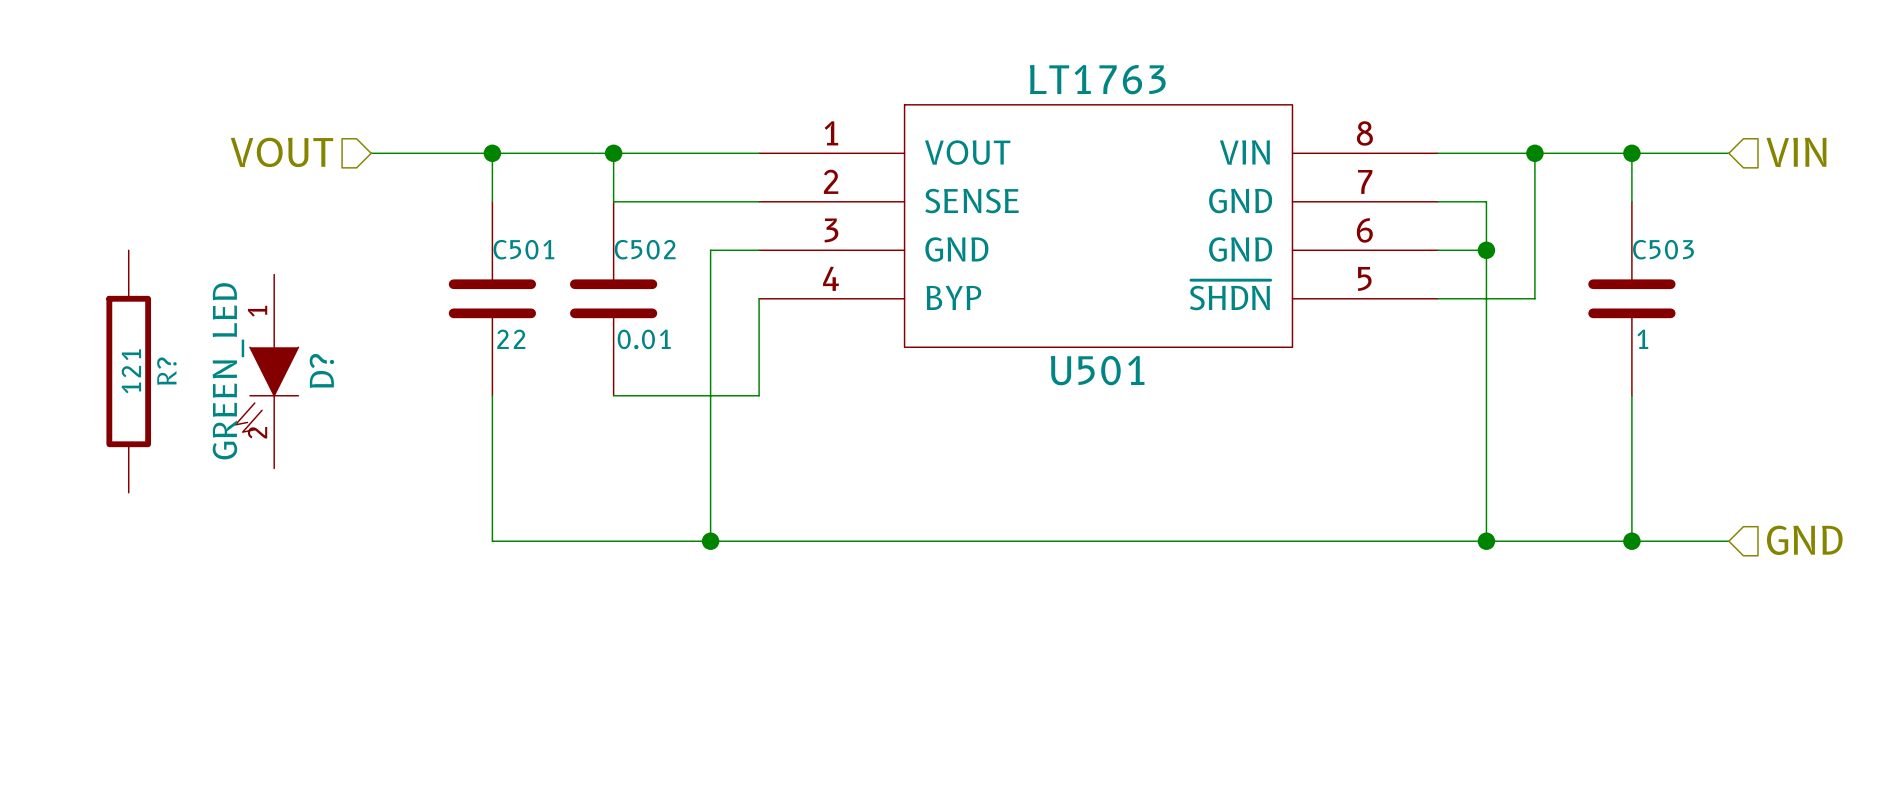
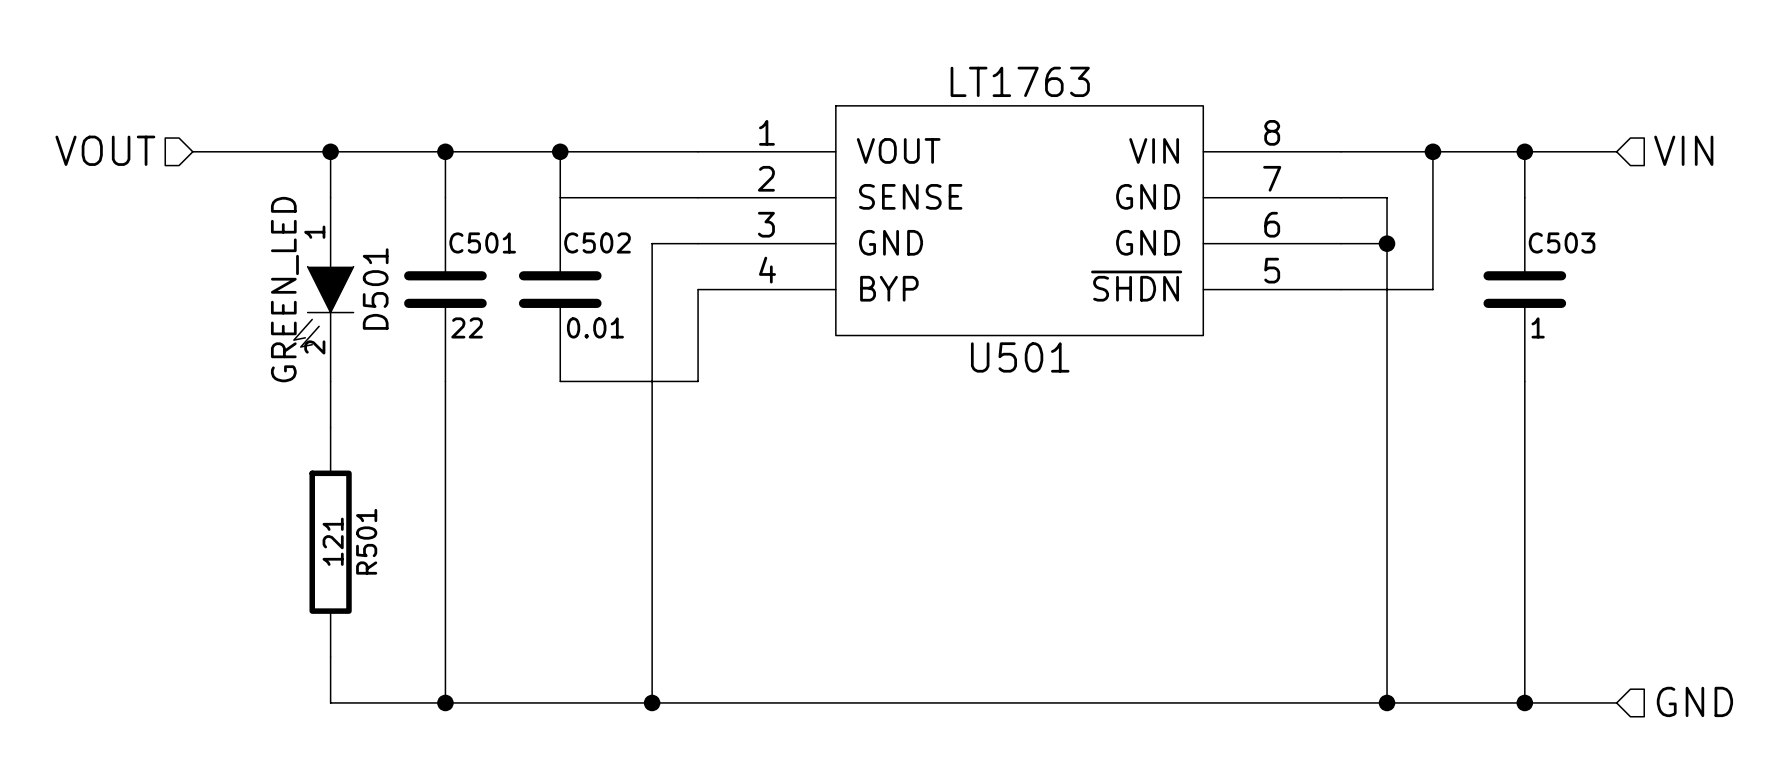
hierarchical label position: VOUT (281, 152) -> VOUT (105, 150)
wire: none -> (192, 151) (330, 151) (330, 197)
junction: none -> (330, 151)
D501: none -> GREEN_LED (323, 289)
R?: 121 (128, 371) -> none
D?: GREEN_LED (266, 371) -> none
wire: none -> (330, 381) (330, 427)
hierarchical label position: GND (1804, 540) -> GND (1694, 701)
wire: (492, 541) (1728, 541) -> (445, 519) (445, 702)
wire: none -> (652, 519) (652, 702)
junction: (710, 541) -> none
wire: none -> (1387, 519) (1387, 702)
junction: (1486, 541) -> none
wire: none -> (1524, 519) (1524, 702)
junction: (1631, 541) -> none
R501: none -> 121 (330, 542)
wire: none -> (330, 657) (330, 702) (1616, 702)
junction: none -> (445, 702)
junction: none -> (652, 702)
junction: none -> (1387, 702)
junction: none -> (1524, 702)

